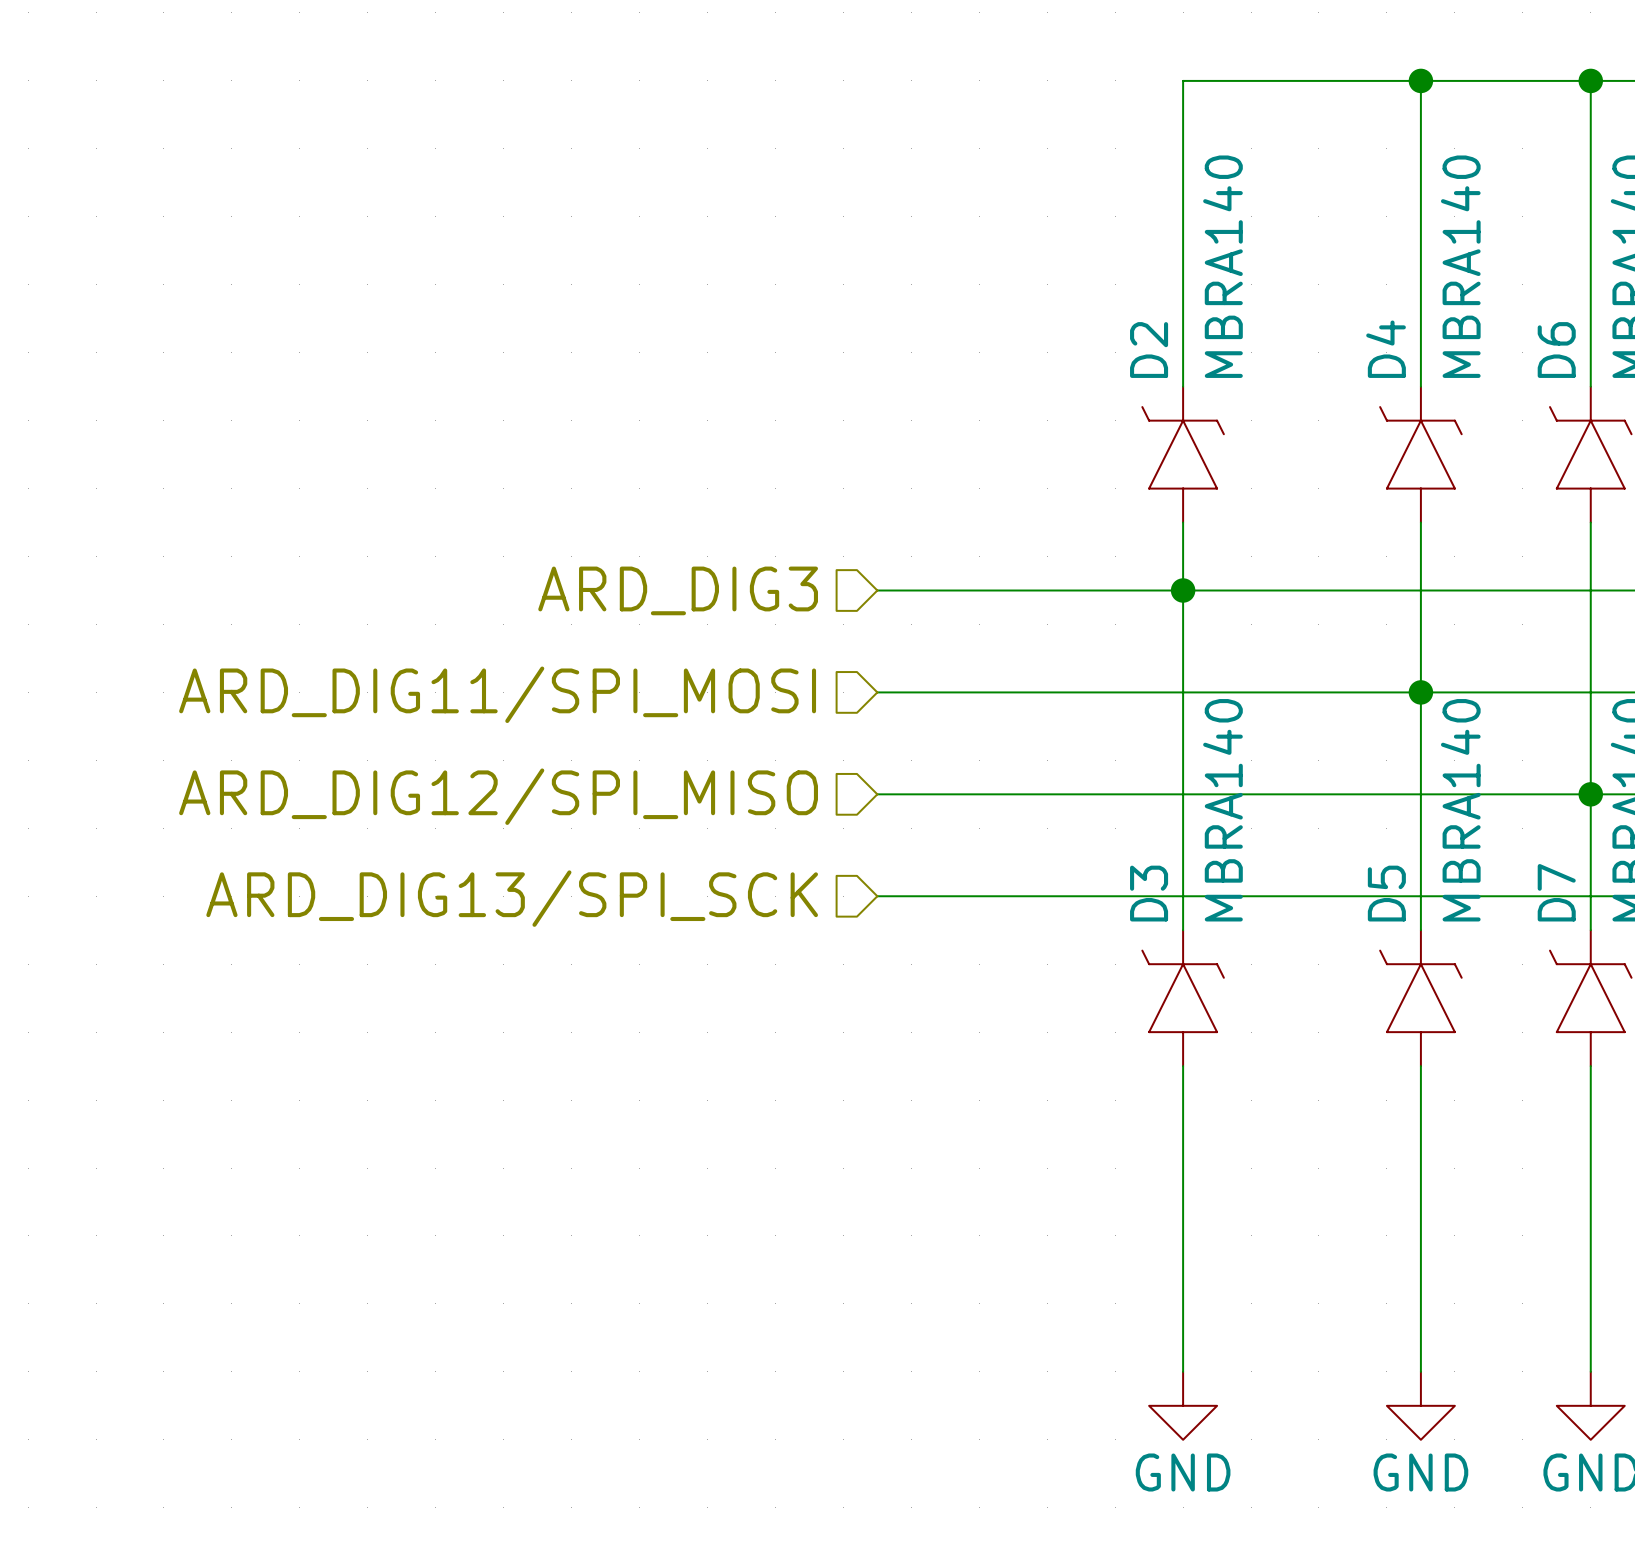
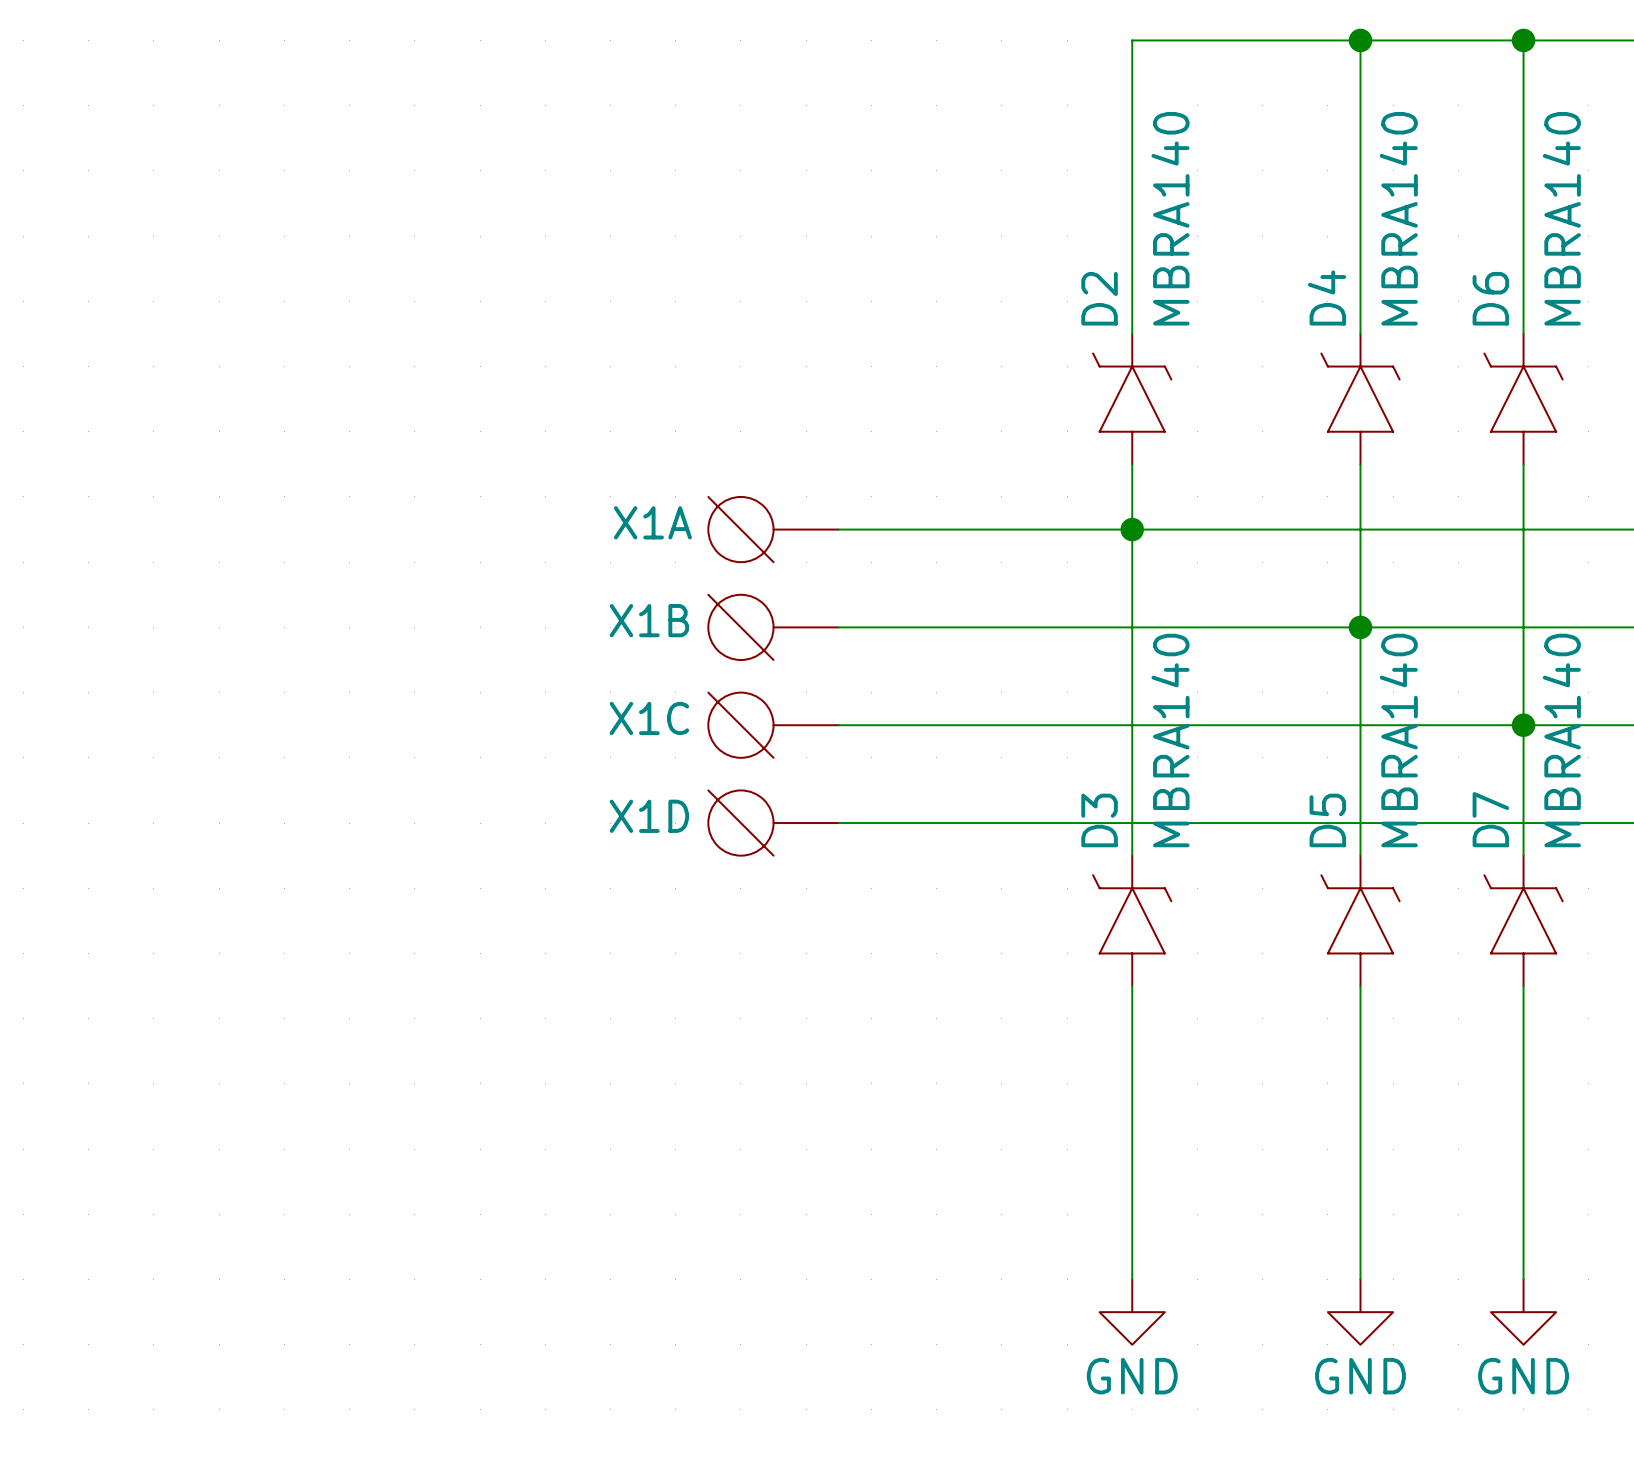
hierarchical label: ARD_DIG3 (678, 590) -> none
X1A: none -> (773, 529)
X1B: none -> (773, 627)
hierarchical label: ARD_DIG11/SPI_MOSI (497, 694) -> none
X1C: none -> (773, 725)
hierarchical label: ARD_DIG12/SPI_MISO (498, 796) -> none
X1D: none -> (773, 823)
hierarchical label: ARD_DIG13/SPI_SCK (512, 898) -> none

